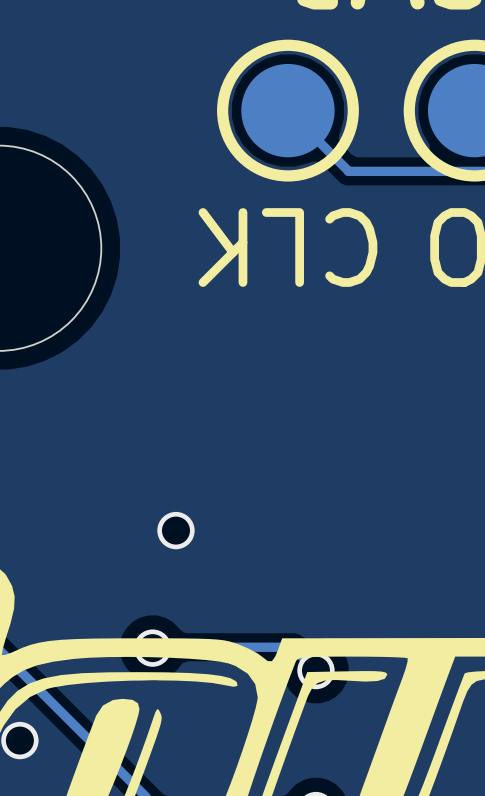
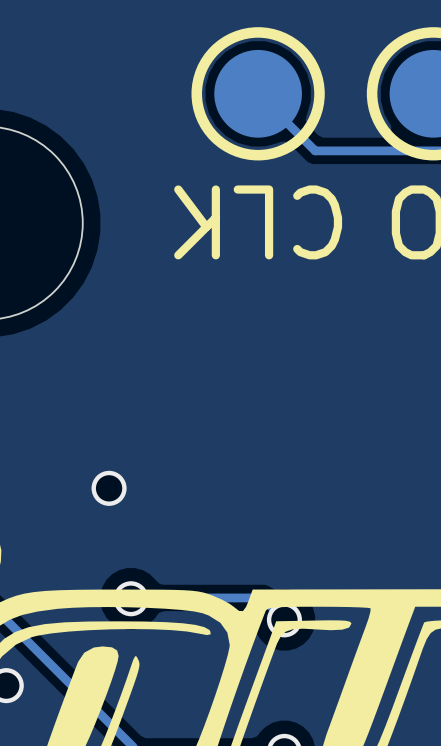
via position: (175, 530) -> (109, 488)

